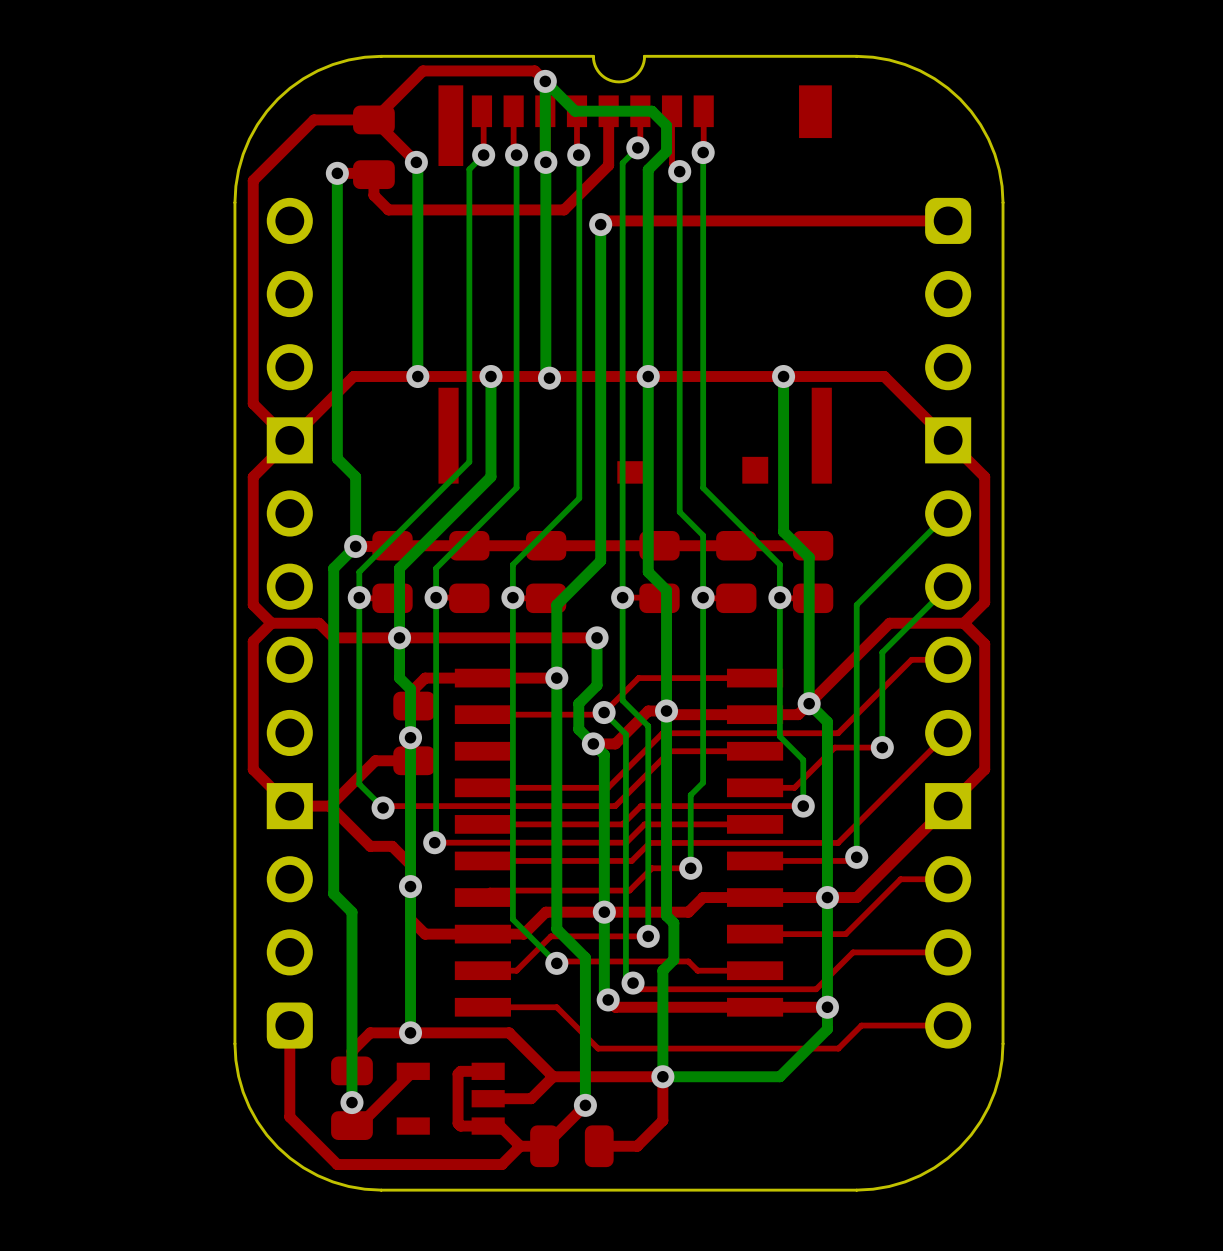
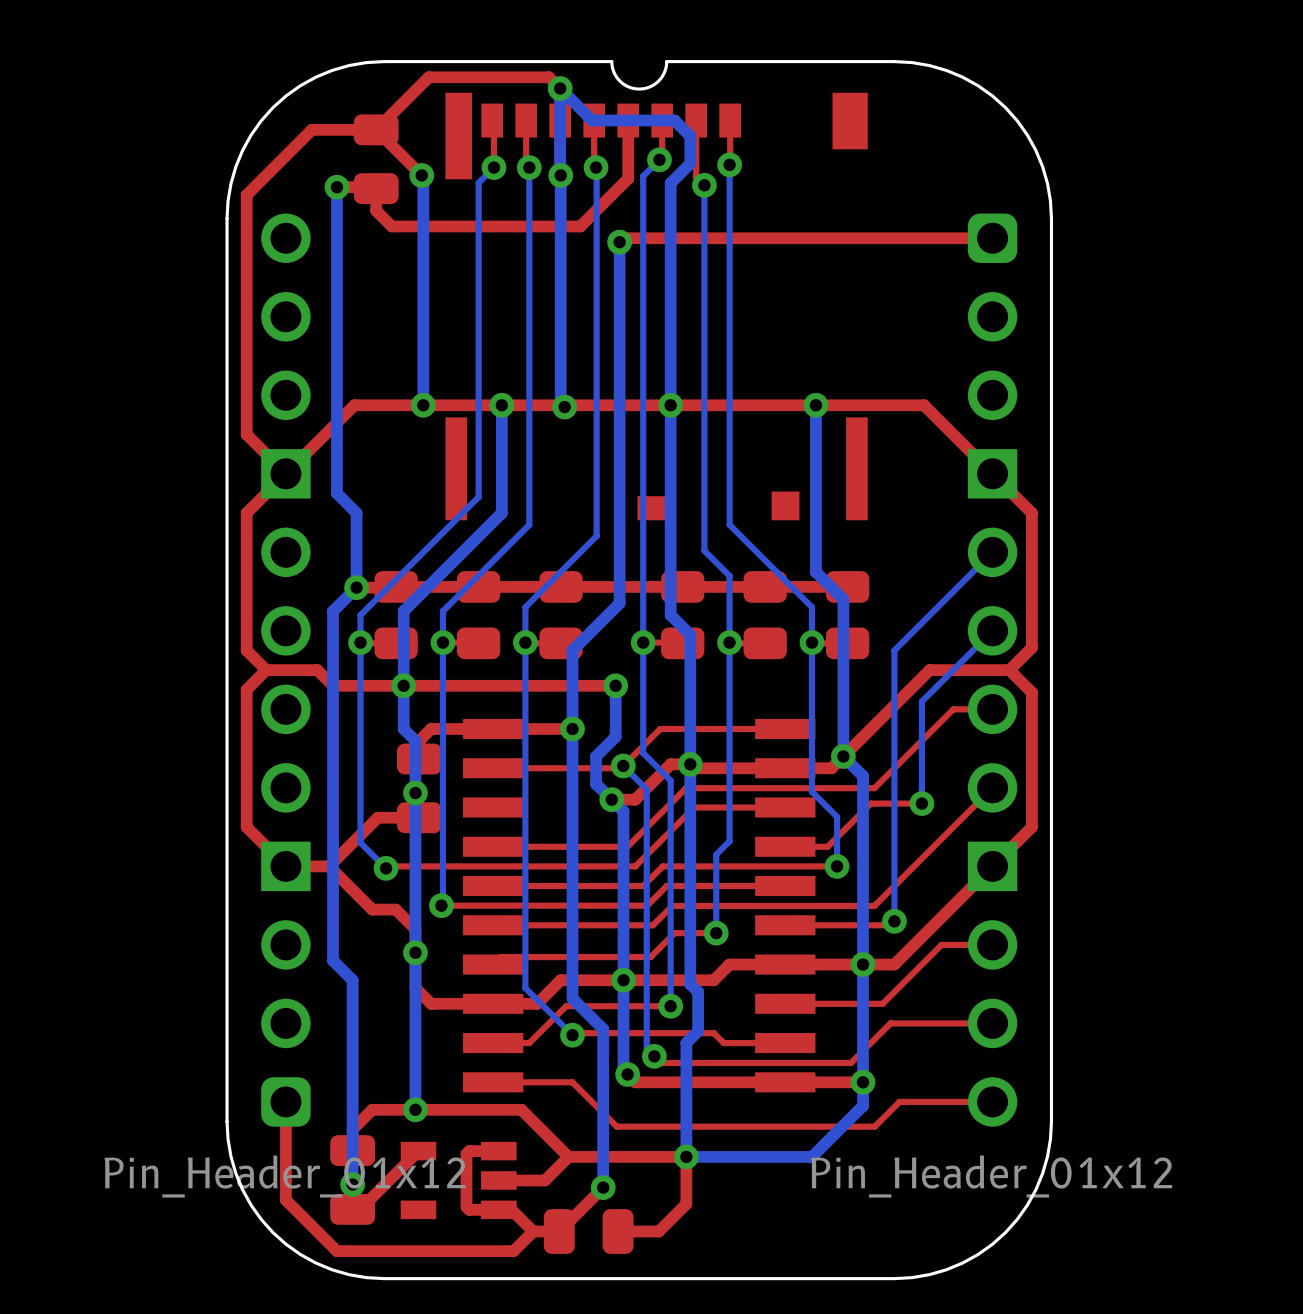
drawing: none -> [104, 1155, 466, 1198]
drawing: none -> [811, 1155, 1173, 1198]

